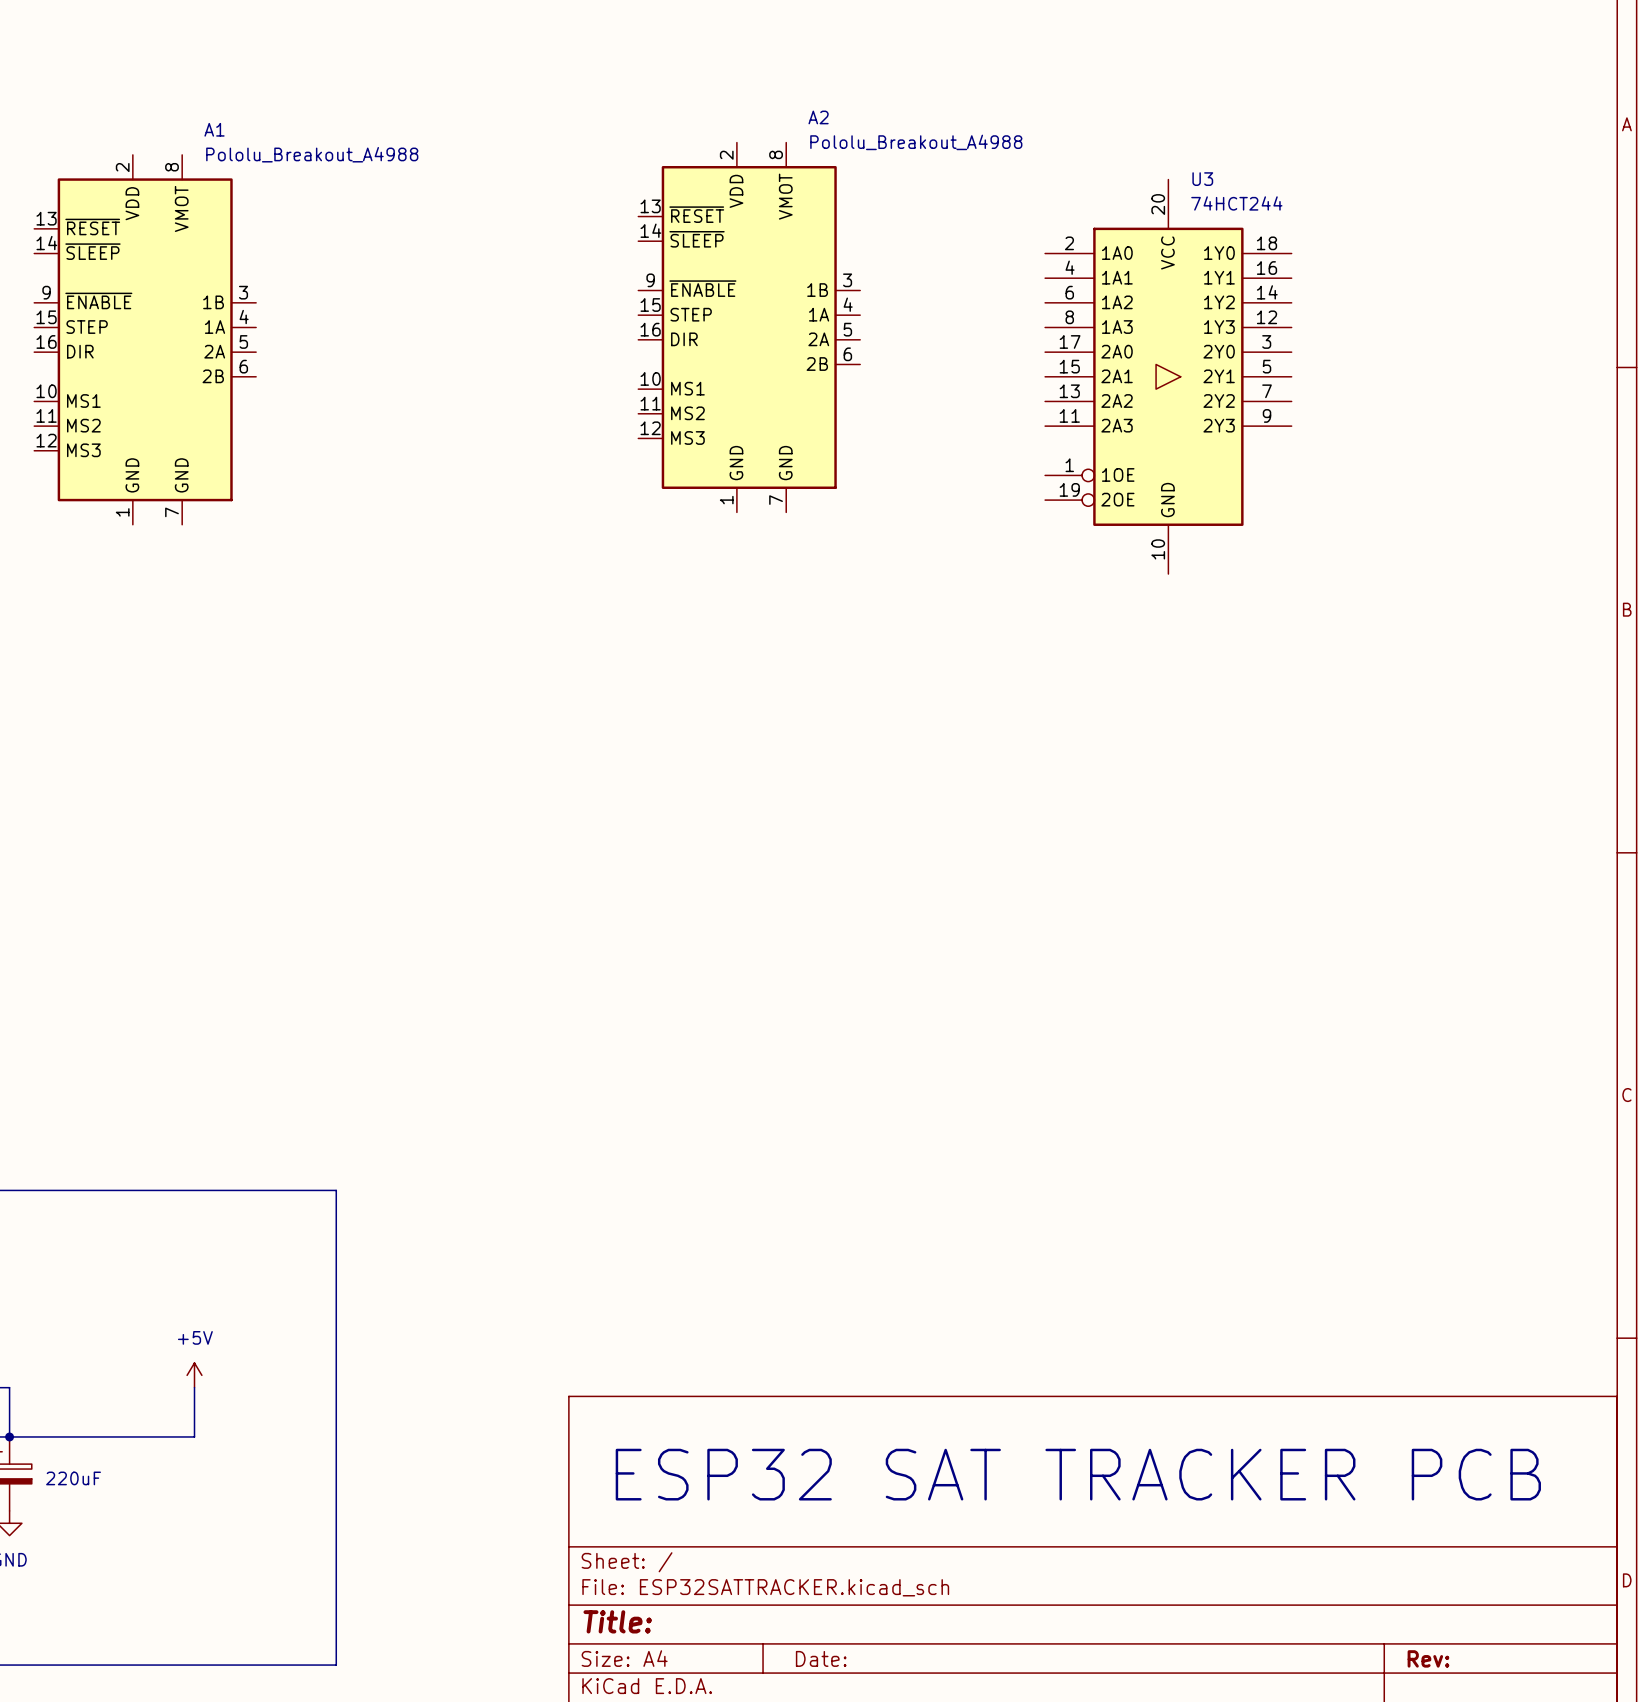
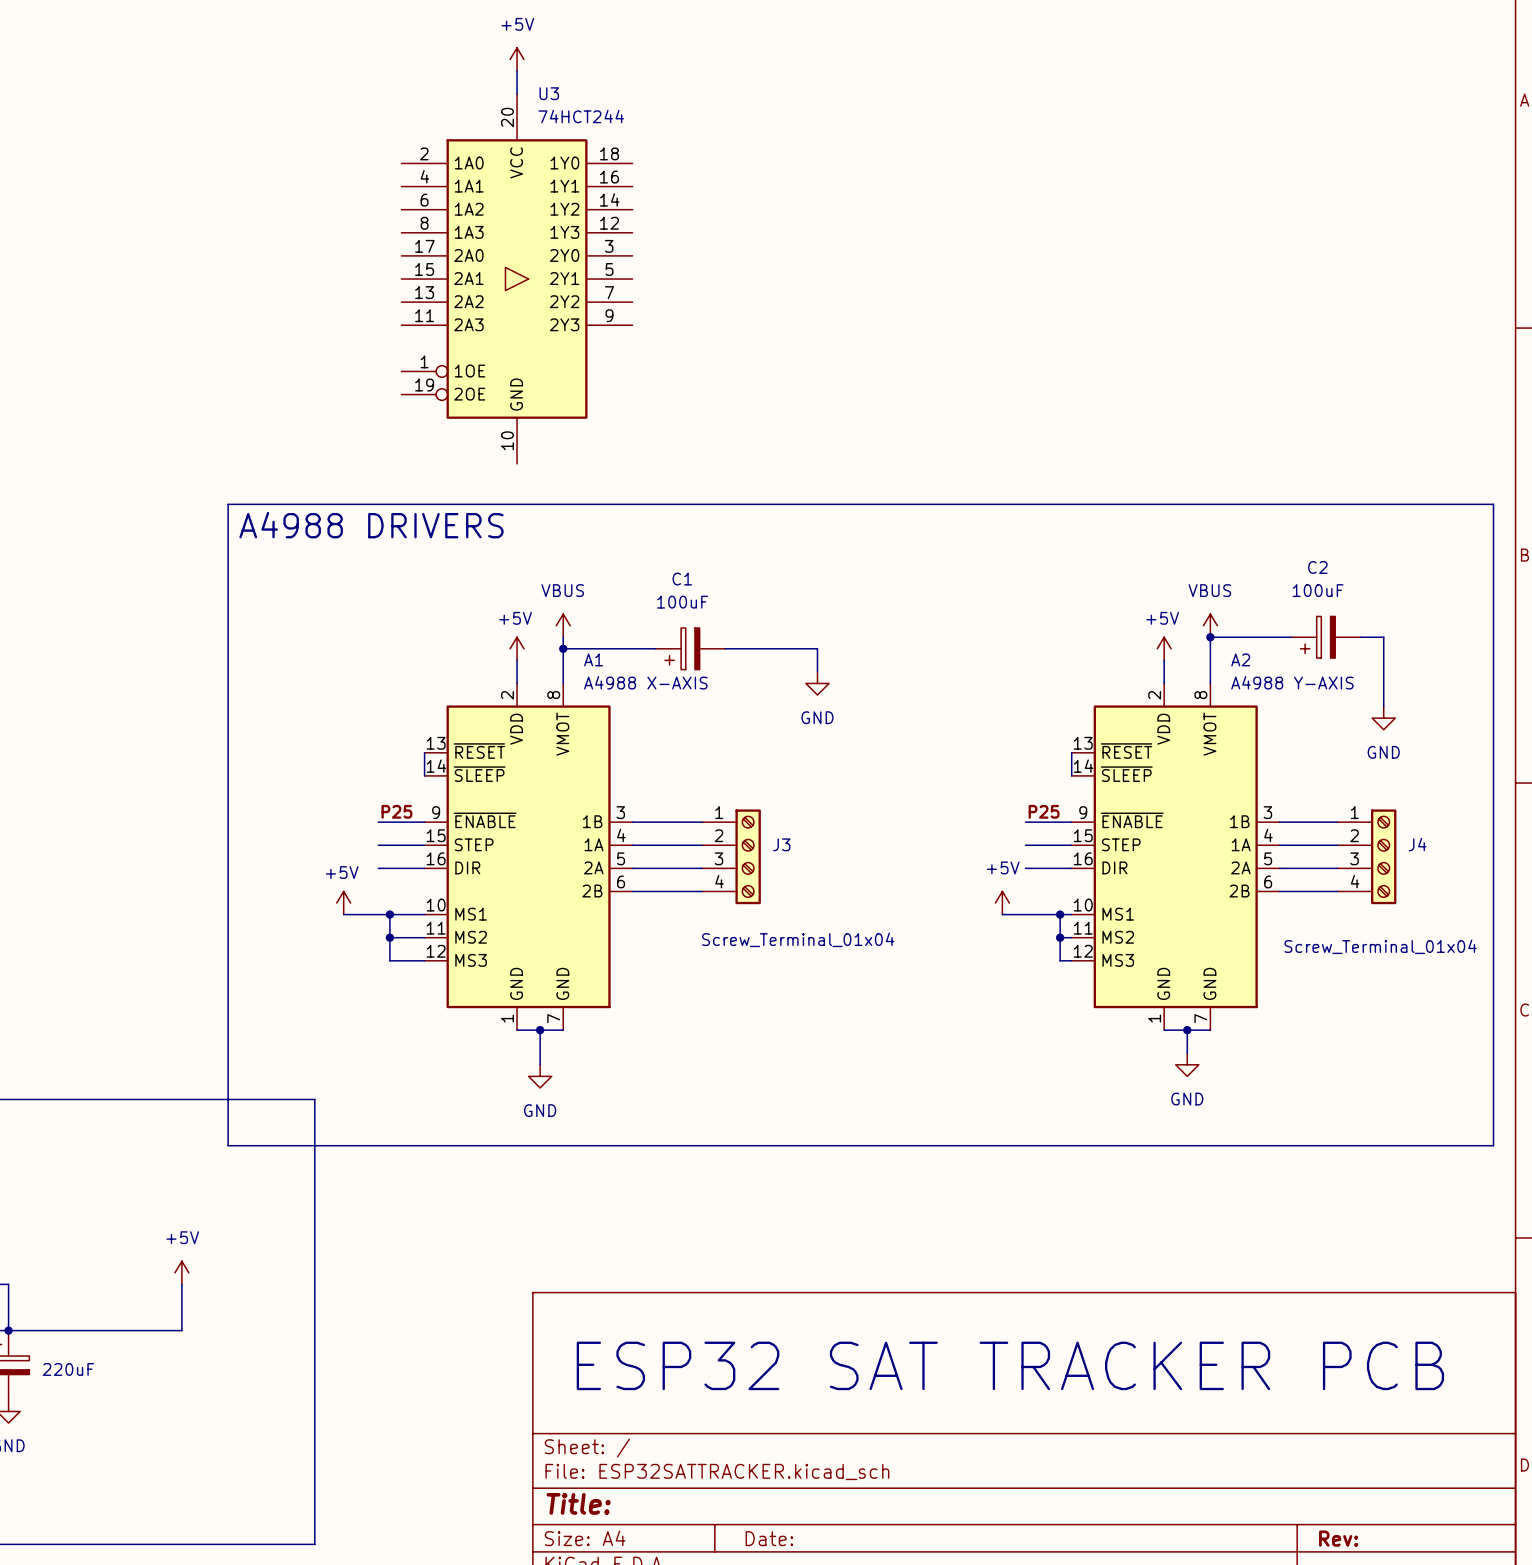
power symbol: none -> +5V (517, 59)
wire: none -> (517, 71) (517, 94)
A2 value: Pololu_Breakout_A4988 (916, 142) -> A4988 Y-AXIS (1292, 682)
A1 value: Pololu_Breakout_A4988 (312, 154) -> A4988 X-AXIS (645, 682)
A2 position: (749, 327) -> (1175, 856)
A1 position: (145, 339) -> (528, 856)
U3 position: (1168, 376) -> (517, 279)
line: none -> (228, 504) (1493, 504) (1493, 1145) (228, 1145) (228, 504)
text: none -> A4988 DRIVERS (371, 525)
power symbol: none -> VBUS (563, 625)
power symbol: none -> VBUS (1210, 625)
wire: none -> (563, 637) (563, 683)
junction: none -> (1210, 637)
wire: none -> (1291, 637) (1210, 637) (1210, 683)
C2: none -> 100uF (1325, 637)
wire: none -> (1360, 637) (1383, 637) (1383, 706)
power symbol: none -> +5V (517, 648)
wire: none -> (563, 648) (655, 648)
junction: none -> (563, 648)
C1: none -> 100uF (690, 648)
wire: none -> (725, 648) (817, 648) (817, 671)
power symbol: none -> +5V (1164, 648)
wire: none -> (517, 660) (517, 683)
wire: none -> (1164, 660) (1164, 683)
power symbol: none -> GND (817, 683)
power symbol: none -> GND (1383, 718)
wire: none -> (424, 752) (424, 775)
wire: none -> (1071, 752) (1071, 775)
label: none -> P25 (396, 811)
label: none -> P25 (1044, 811)
wire: none -> (378, 822) (424, 822)
wire: none -> (632, 822) (701, 822)
wire: none -> (1025, 822) (1071, 822)
wire: none -> (1279, 822) (1337, 822)
wire: none -> (378, 845) (424, 845)
wire: none -> (632, 845) (701, 845)
wire: none -> (1025, 845) (1071, 845)
wire: none -> (1279, 845) (1337, 845)
J3: none -> Screw_Terminal_01x04 (731, 856)
J4: none -> Screw_Terminal_01x04 (1366, 856)
wire: none -> (378, 868) (424, 868)
wire: none -> (632, 868) (701, 868)
wire: none -> (1025, 868) (1071, 868)
wire: none -> (1279, 868) (1337, 868)
wire: none -> (632, 891) (701, 891)
wire: none -> (1279, 891) (1337, 891)
power symbol: none -> +5V (343, 903)
power symbol: none -> +5V (1002, 903)
wire: none -> (343, 914) (424, 914)
wire: none -> (389, 914) (389, 960) (424, 960)
junction: none -> (389, 914)
wire: none -> (1002, 914) (1071, 914)
wire: none -> (1060, 914) (1060, 960) (1071, 960)
junction: none -> (1060, 914)
wire: none -> (389, 937) (424, 937)
junction: none -> (389, 937)
wire: none -> (1060, 937) (1071, 937)
junction: none -> (1060, 937)
wire: none -> (517, 1030) (563, 1030)
wire: none -> (540, 1030) (540, 1064)
junction: none -> (540, 1030)
wire: none -> (1164, 1030) (1210, 1030)
wire: none -> (1187, 1030) (1187, 1053)
junction: none -> (1187, 1030)
power symbol: none -> GND (1187, 1064)
power symbol: none -> GND (540, 1076)

